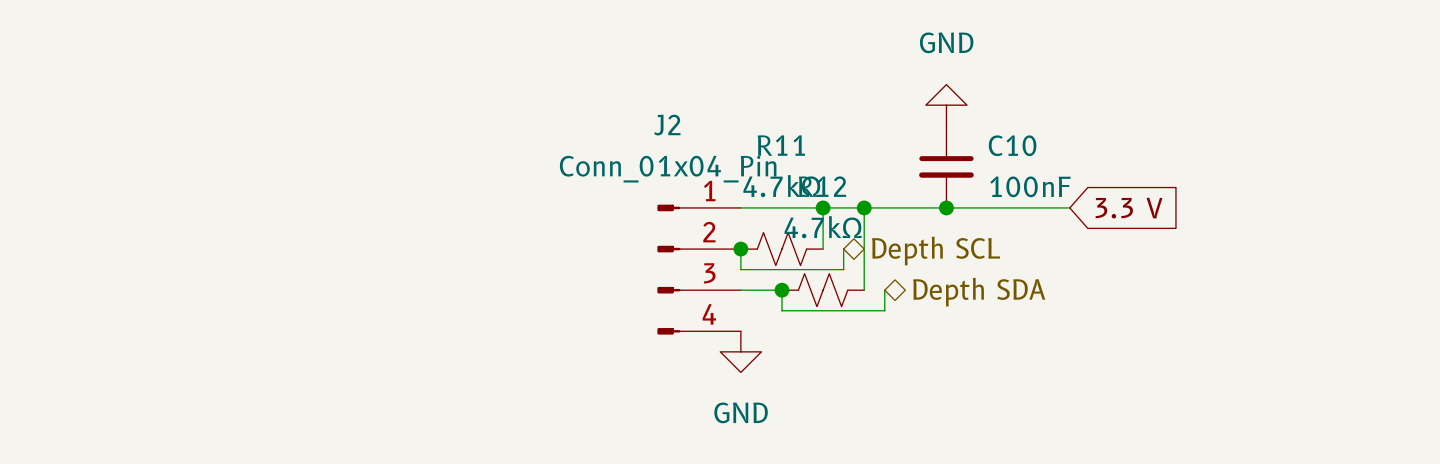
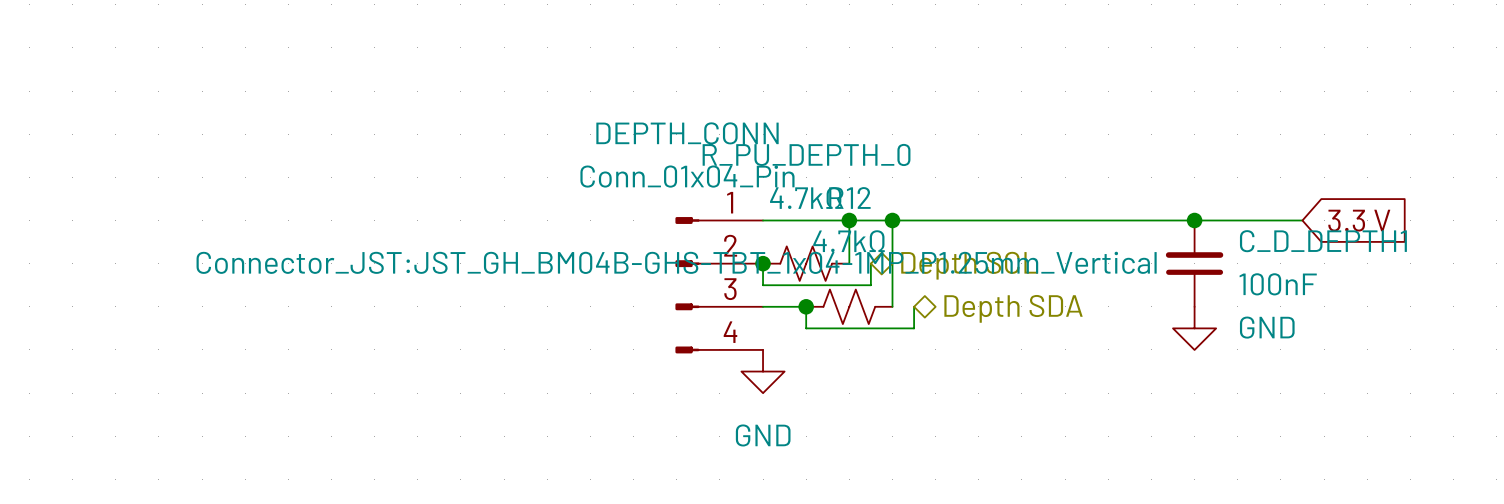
power symbol text position: GND (946, 42) -> GND (1267, 327)
power symbol rotation: 0° (946, 105) -> 180° (1194, 328)
power symbol position: GND (946, 105) -> GND (1194, 328)
J2 name: J2 (667, 125) -> DEPTH_CONN (687, 133)
R11 name: R11 (781, 145) -> R_PU_DEPTH_0 (806, 154)
C10: 100nF (946, 166) -> none
junction: (946, 207) -> none
wire: none -> (1108, 220) (1302, 220)
junction: none -> (1194, 220)
global label position: 3.3 V (1129, 208) -> 3.3 V (1359, 220)
C_D_DEPTH1: none -> 100nF (1194, 263)
J2 text: none -> Connector_JST:JST_GH_BM04B-GHS-TBT_1x04-1MP_P1.25mm_Vertical (676, 262)

